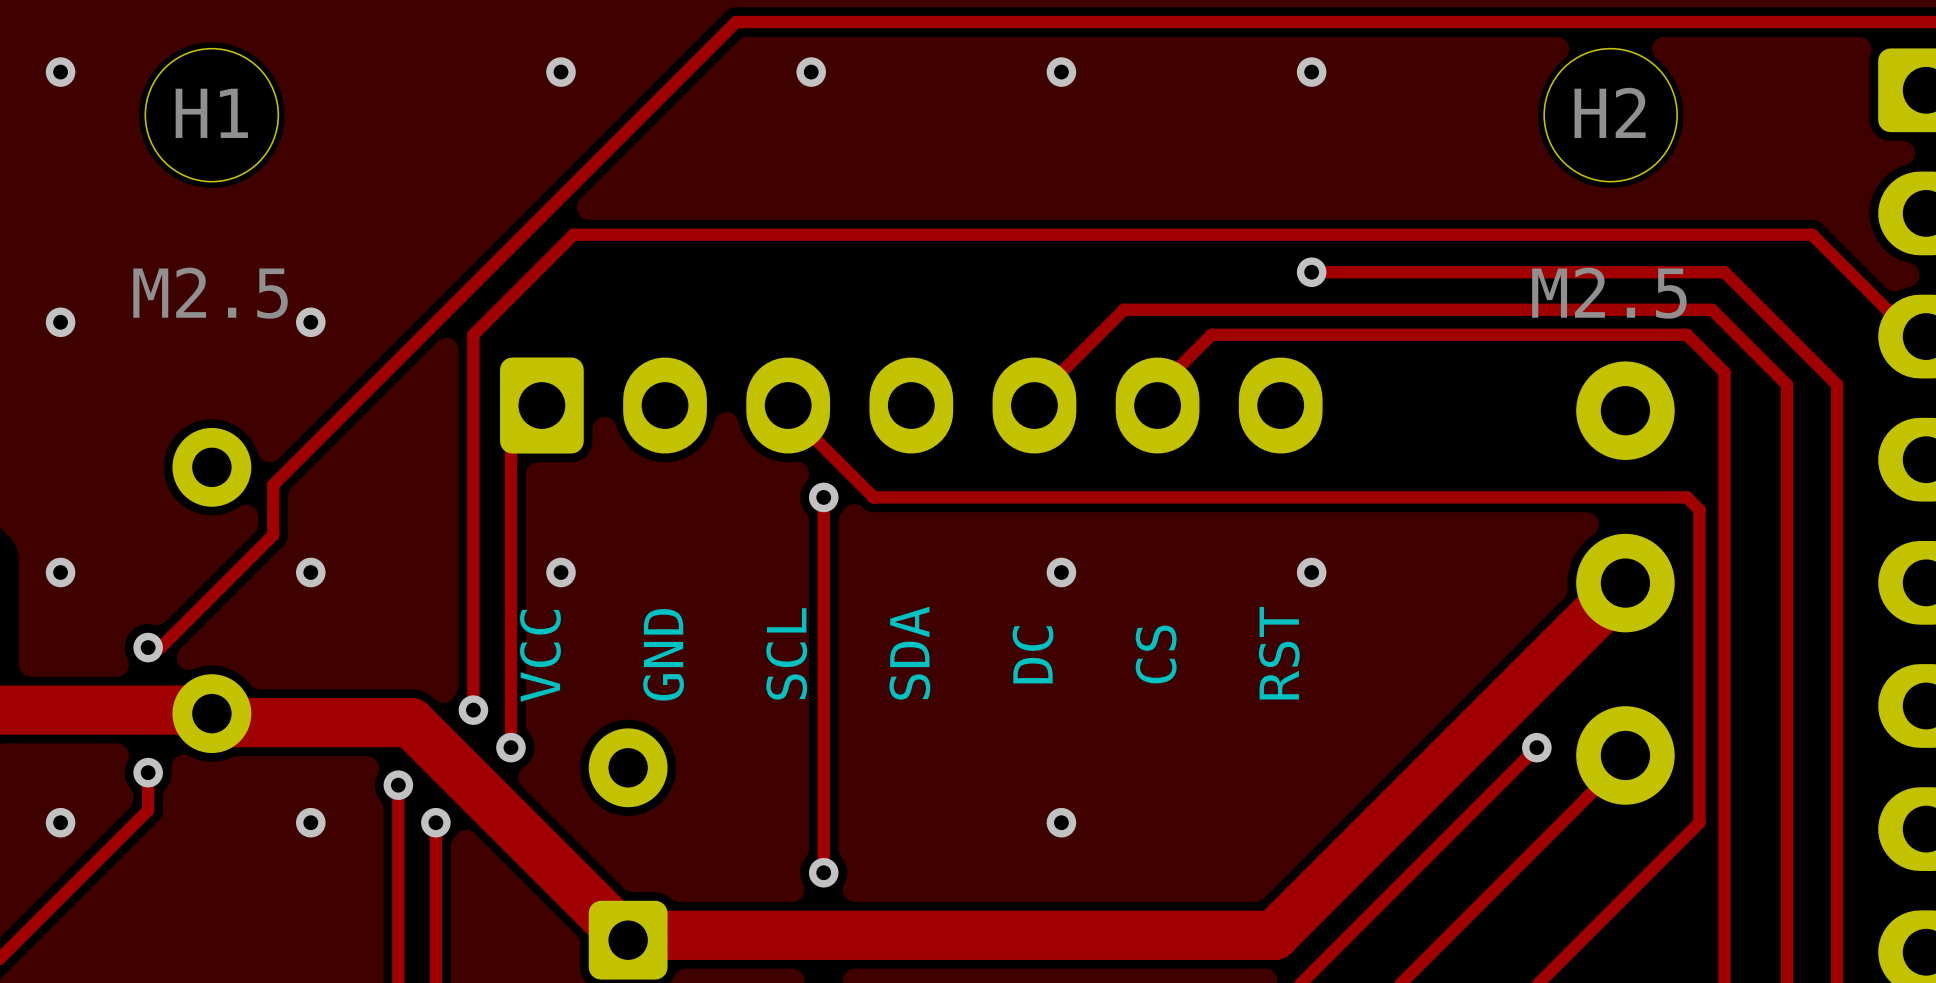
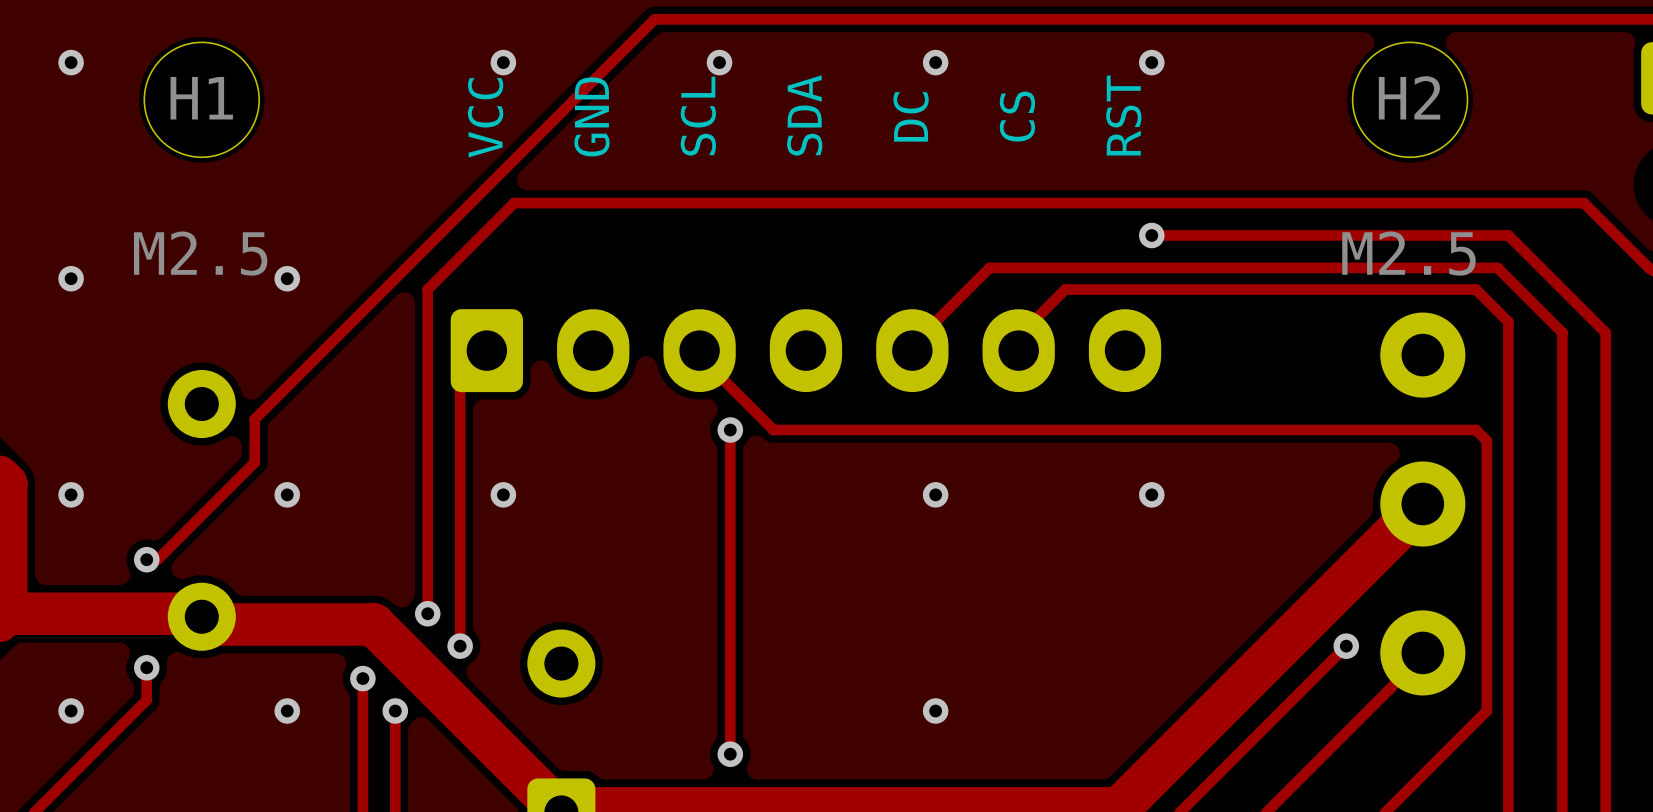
text position: SCL (786, 653) -> SCL (698, 116)
text position: SDA (909, 653) -> SDA (804, 115)
text position: RST (1279, 653) -> RST (1123, 115)
text position: GND (663, 654) -> GND (591, 116)
text position: DC (1033, 654) -> DC (911, 116)
text position: CS (1156, 654) -> CS (1017, 116)
text position: VCC (540, 655) -> VCC (485, 117)

